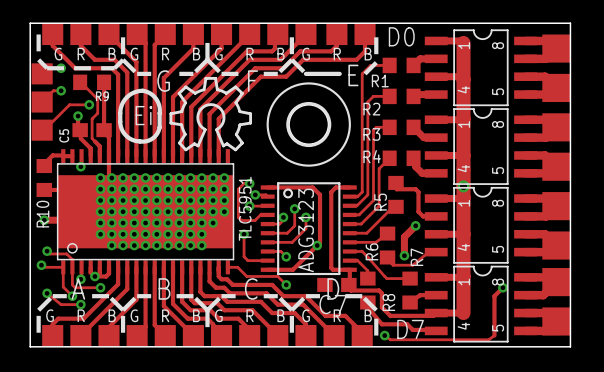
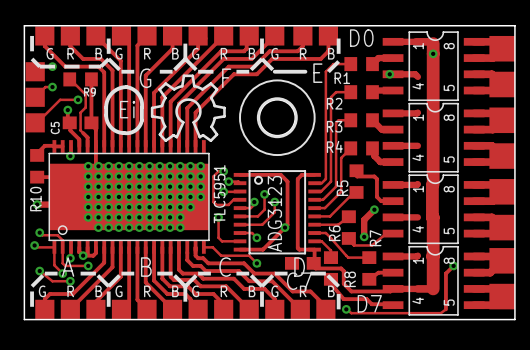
track: (461, 40) (463, 42) (463, 313) -> (416, 41) (430, 41) (433, 43) (433, 288) (417, 288)
via: none -> (433, 53)
via: none -> (389, 74)
via: (463, 186) -> none

